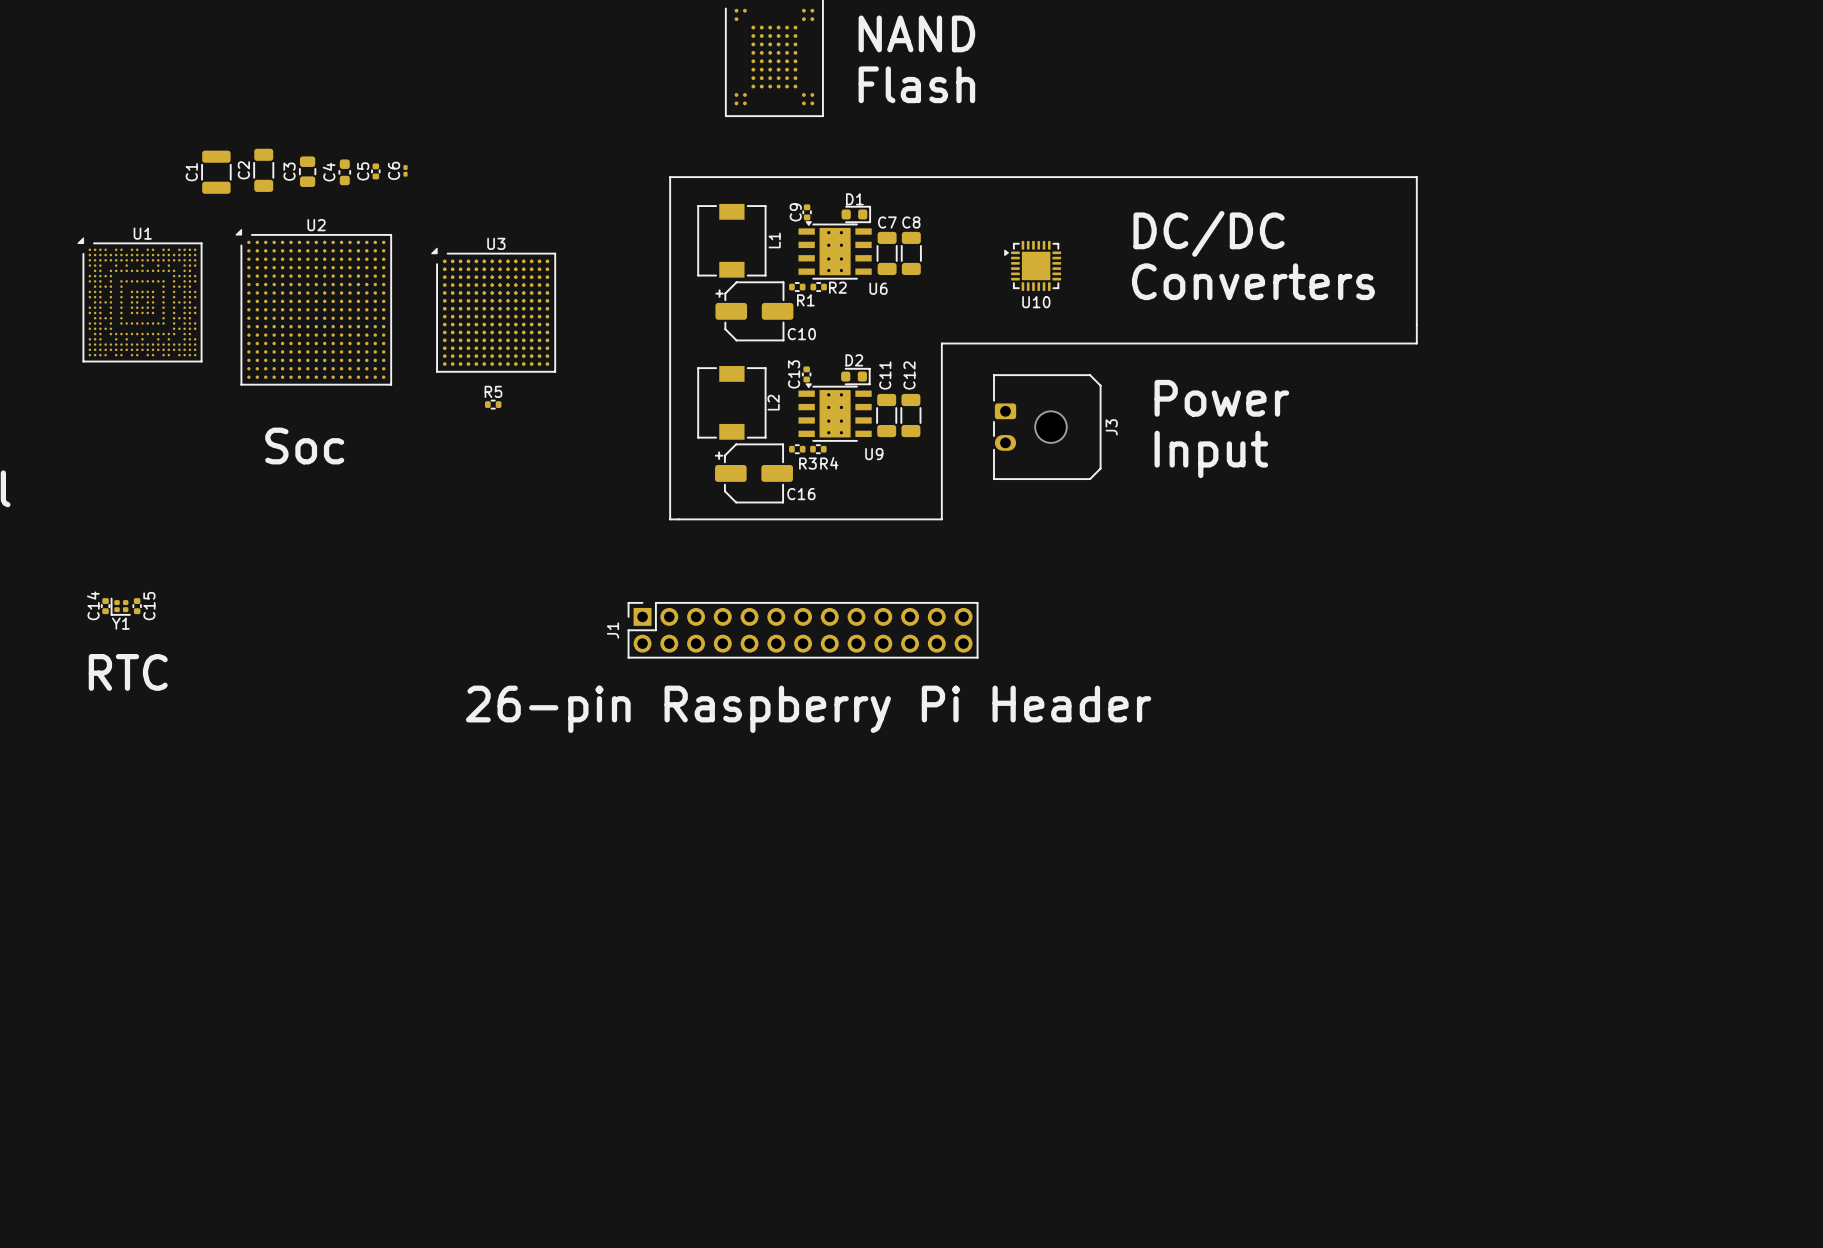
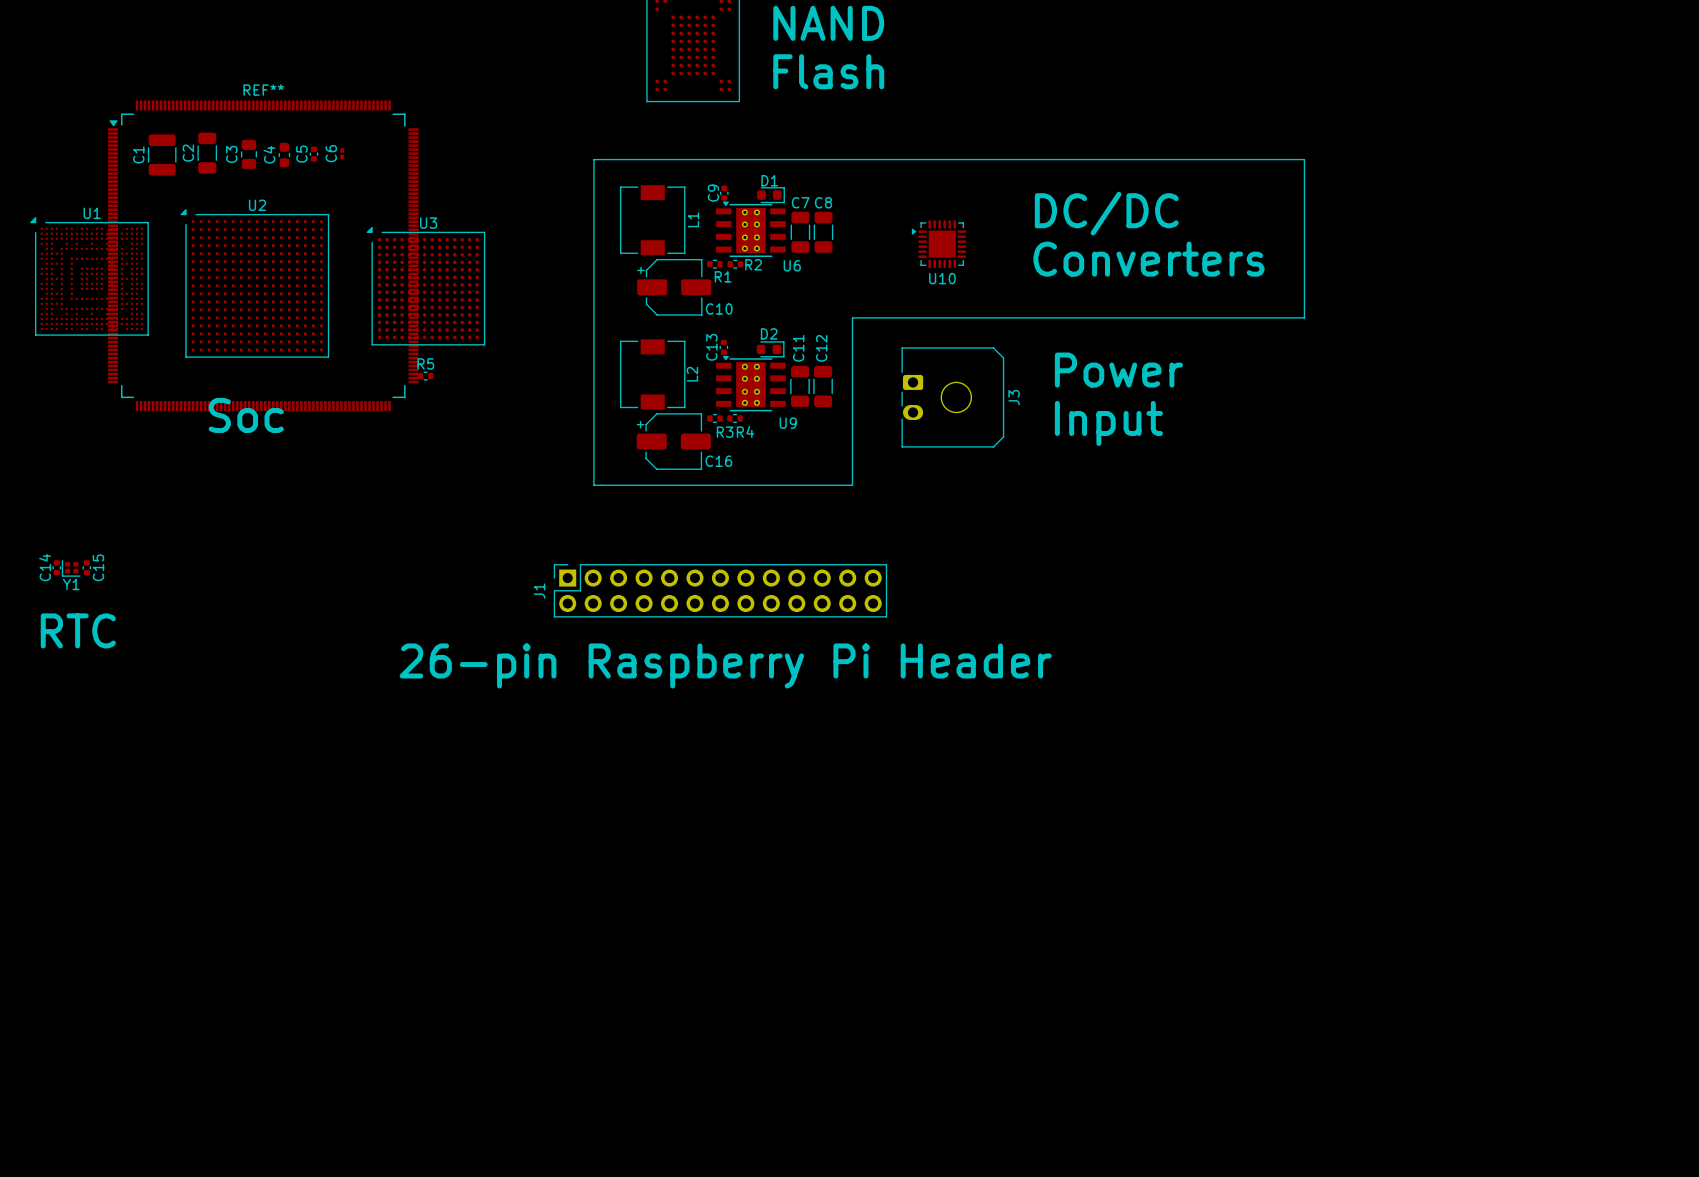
REF**: none -> (263, 255)

